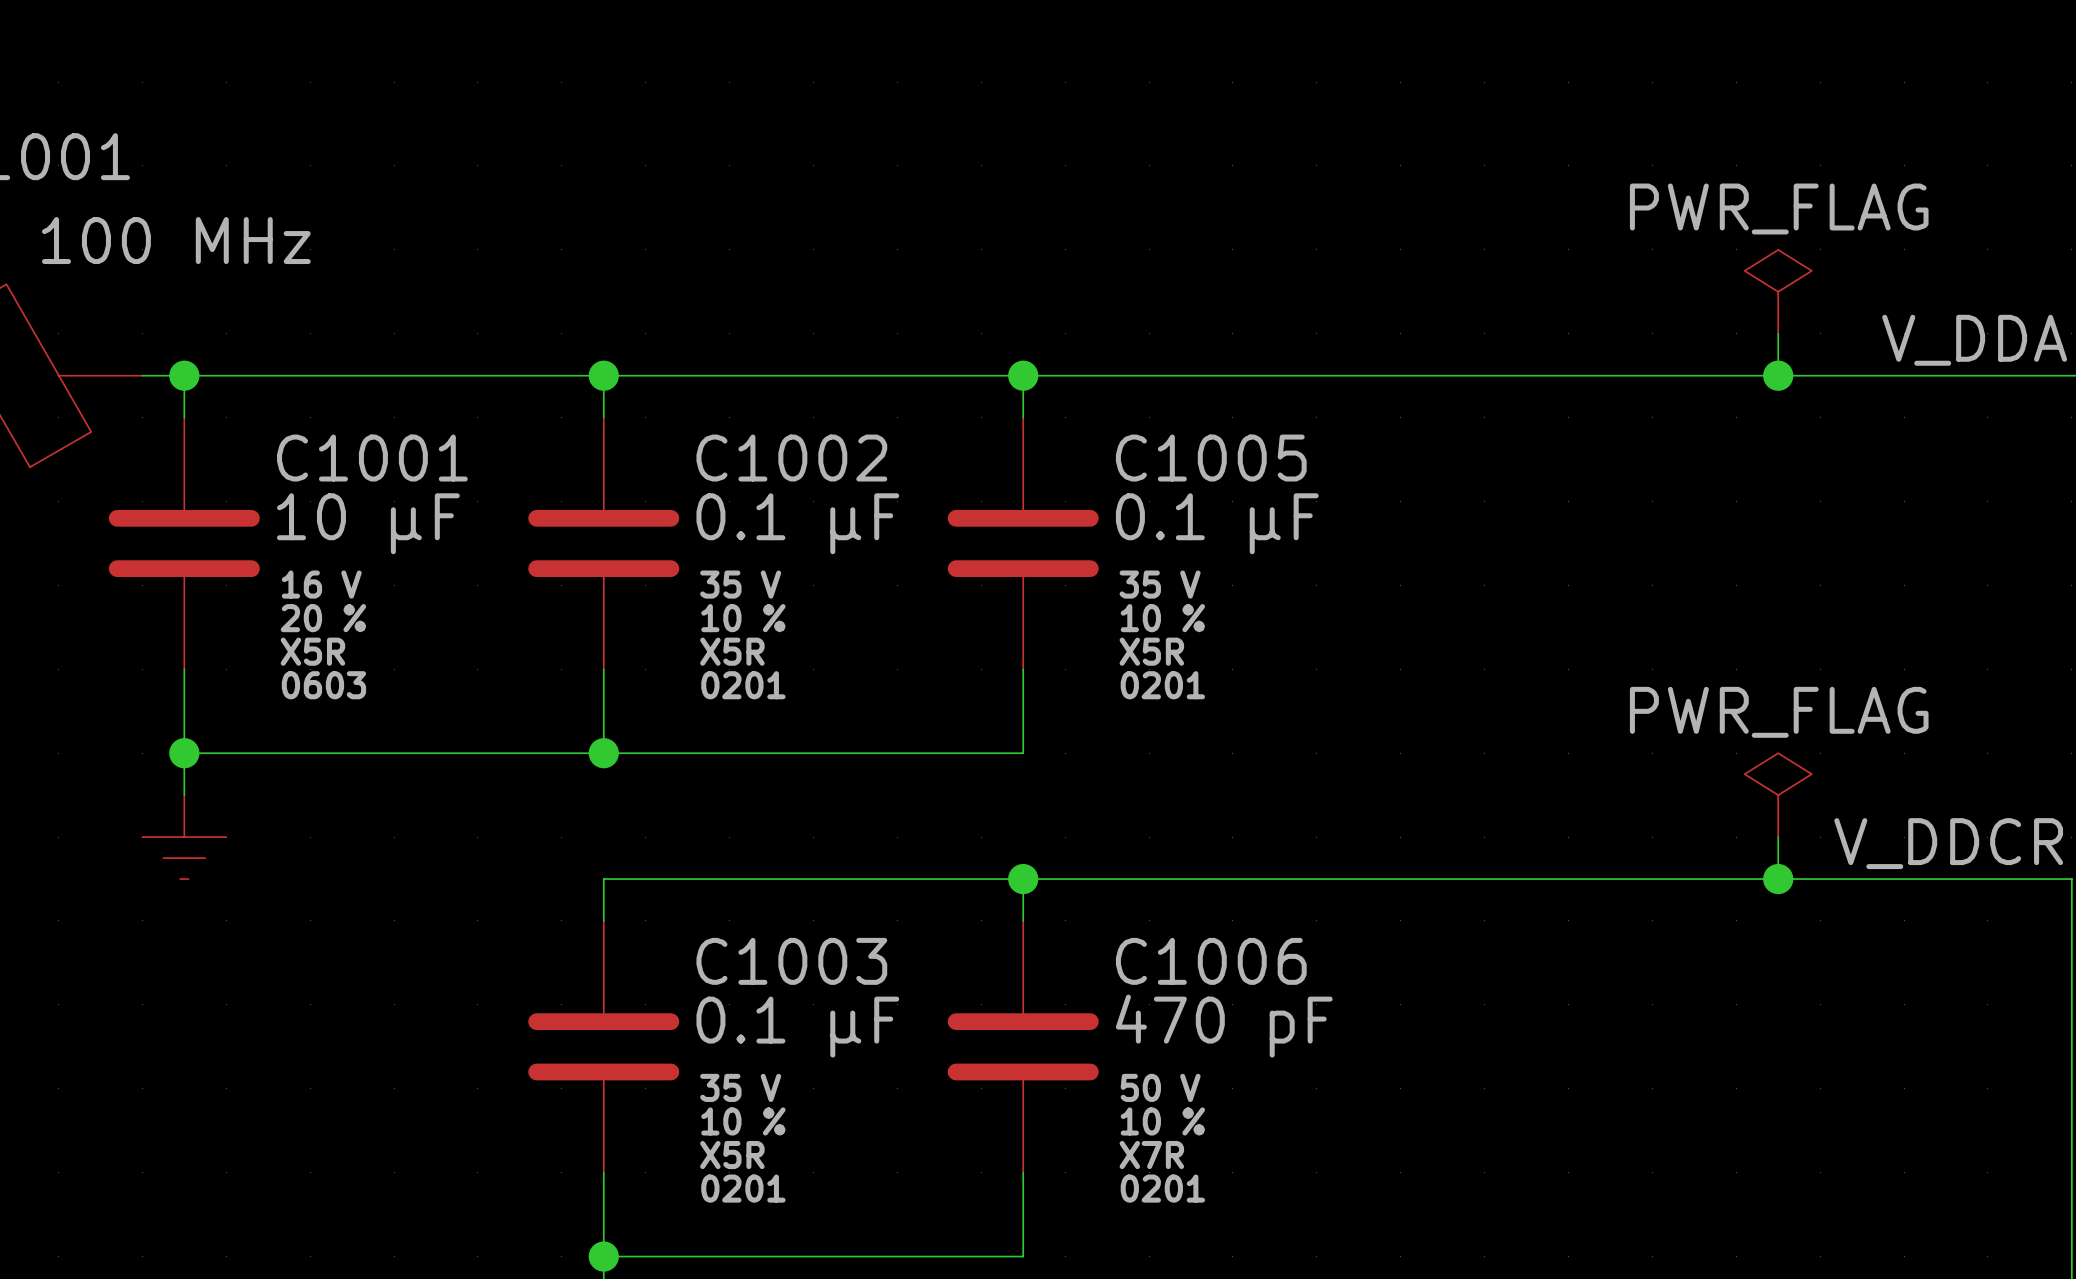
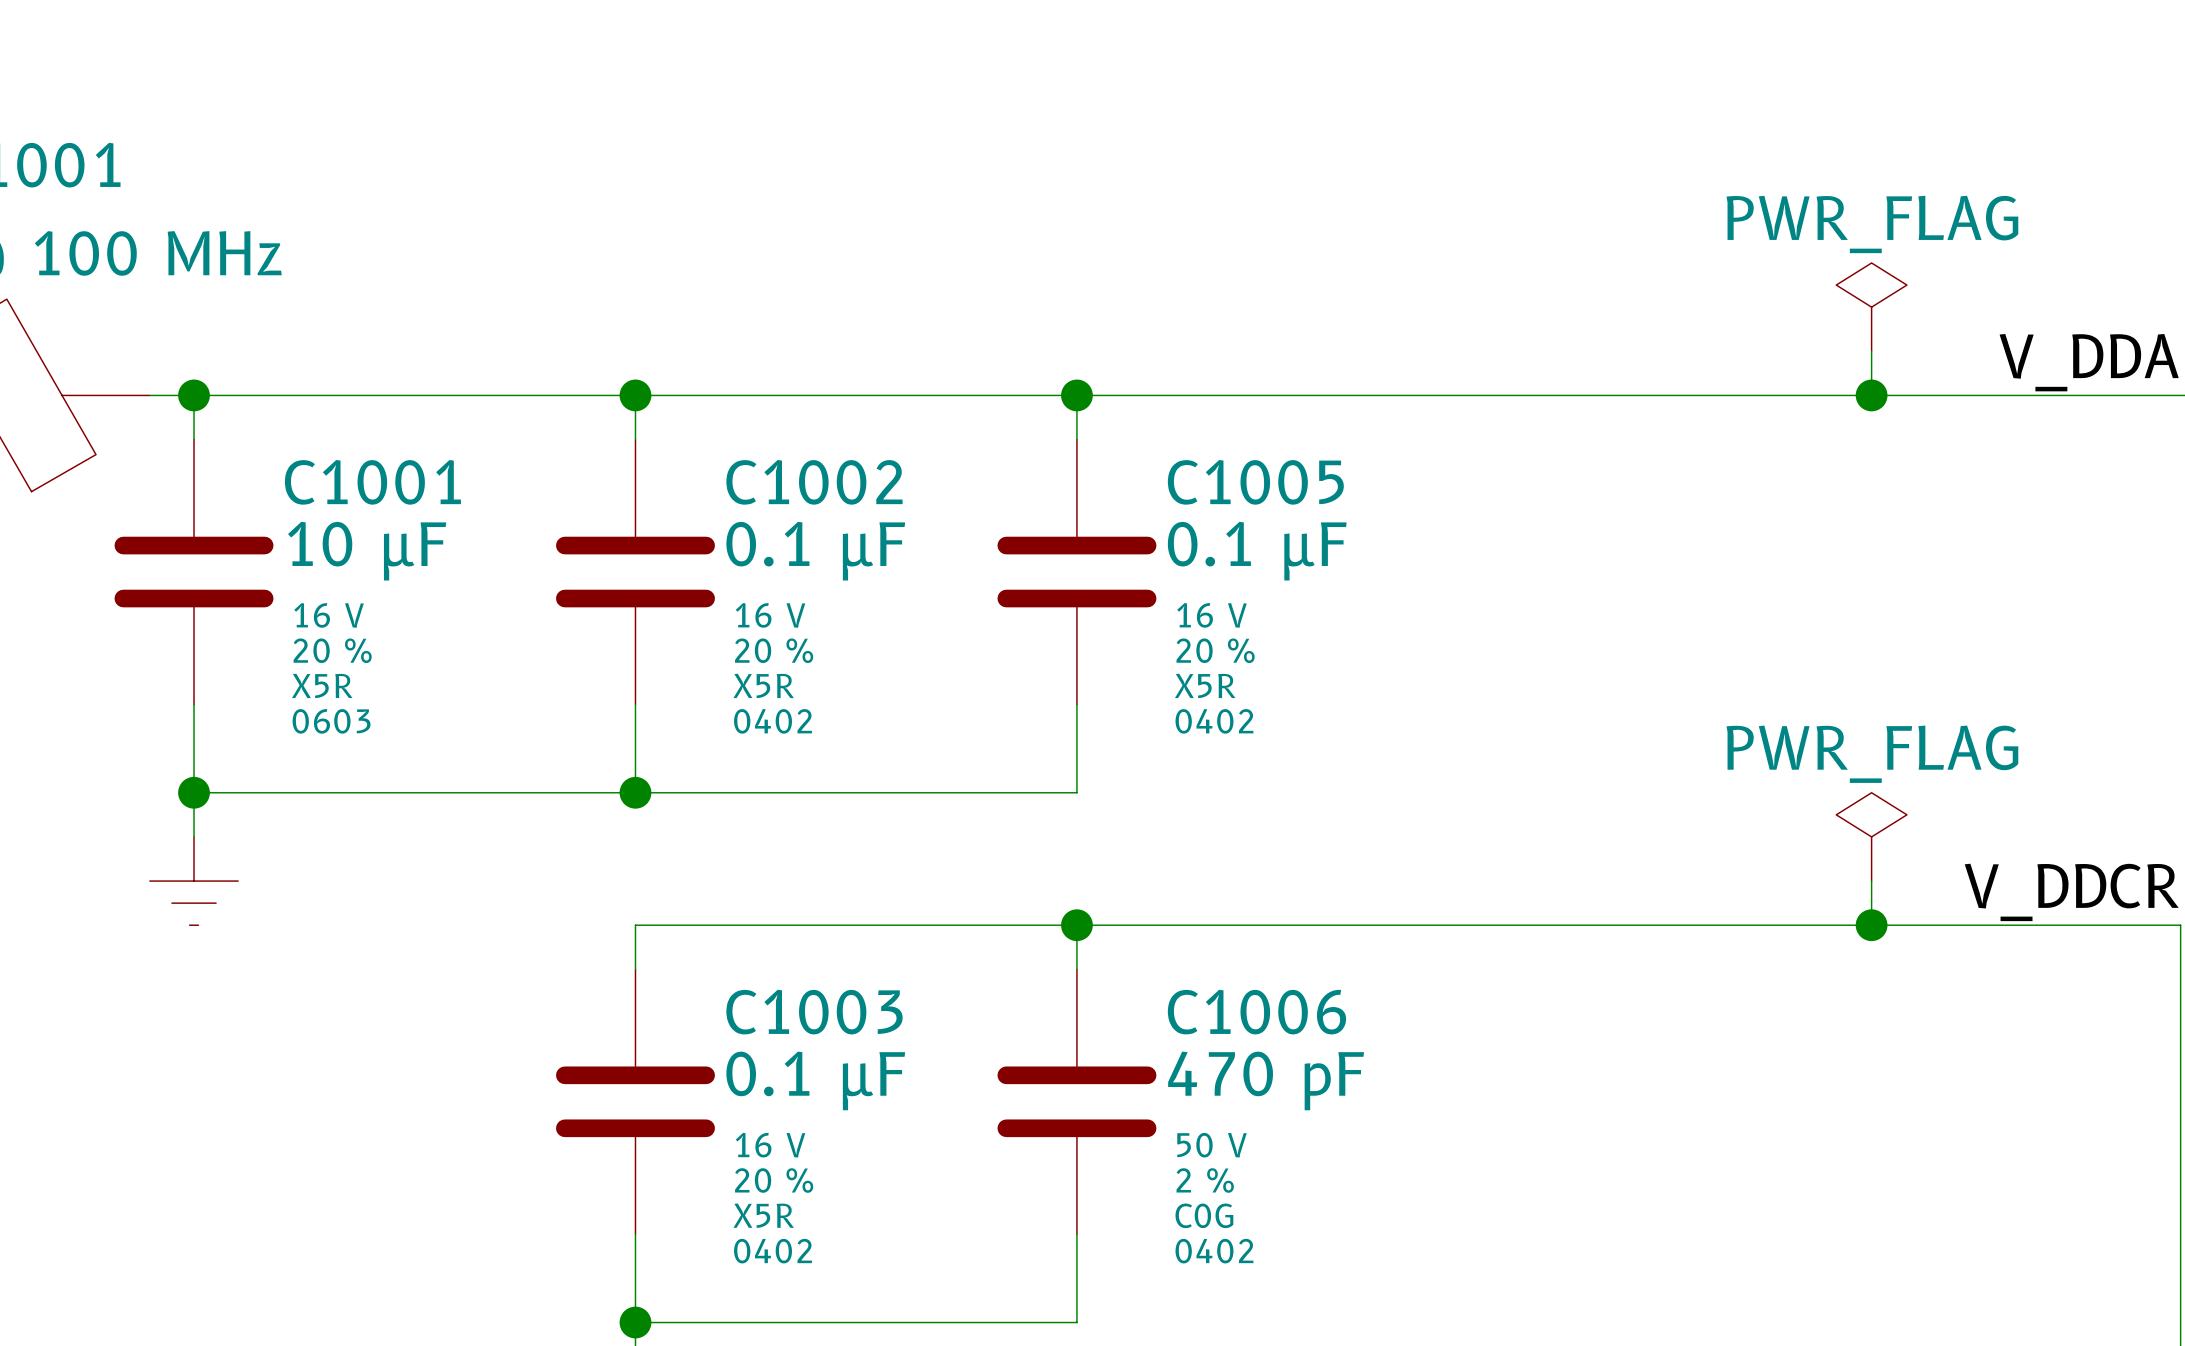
C1002 text: 35 V (740, 584) -> 16 V (770, 615)
C1005 text: 35 V (1160, 584) -> 16 V (1211, 615)
C1002 text: 10 % (743, 618) -> 20 % (774, 650)
C1005 text: 10 % (1162, 618) -> 20 % (1215, 650)
C1002 text: 0201 (743, 685) -> 0402 (772, 721)
C1005 text: 0201 (1162, 685) -> 0402 (1214, 721)
C1003 text: 35 V (740, 1087) -> 16 V (770, 1145)
C1003 text: 10 % (743, 1121) -> 20 % (774, 1180)
C1006 text: 10 % (1162, 1121) -> 2 % (1205, 1180)
C1006 text: X7R (1151, 1155) -> C0G (1204, 1215)
C1003 text: 0201 (743, 1188) -> 0402 (772, 1251)
C1006 text: 0201 (1162, 1188) -> 0402 (1214, 1251)

